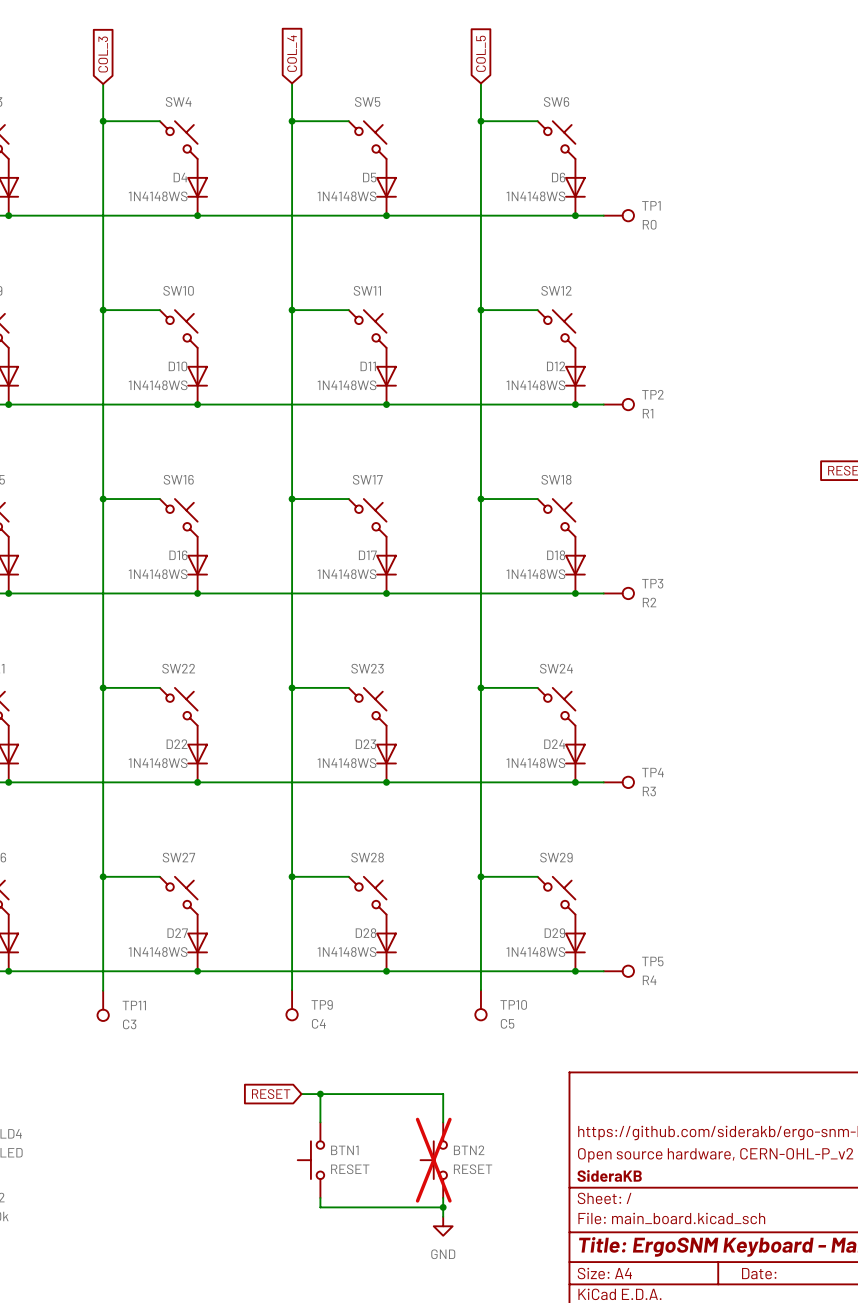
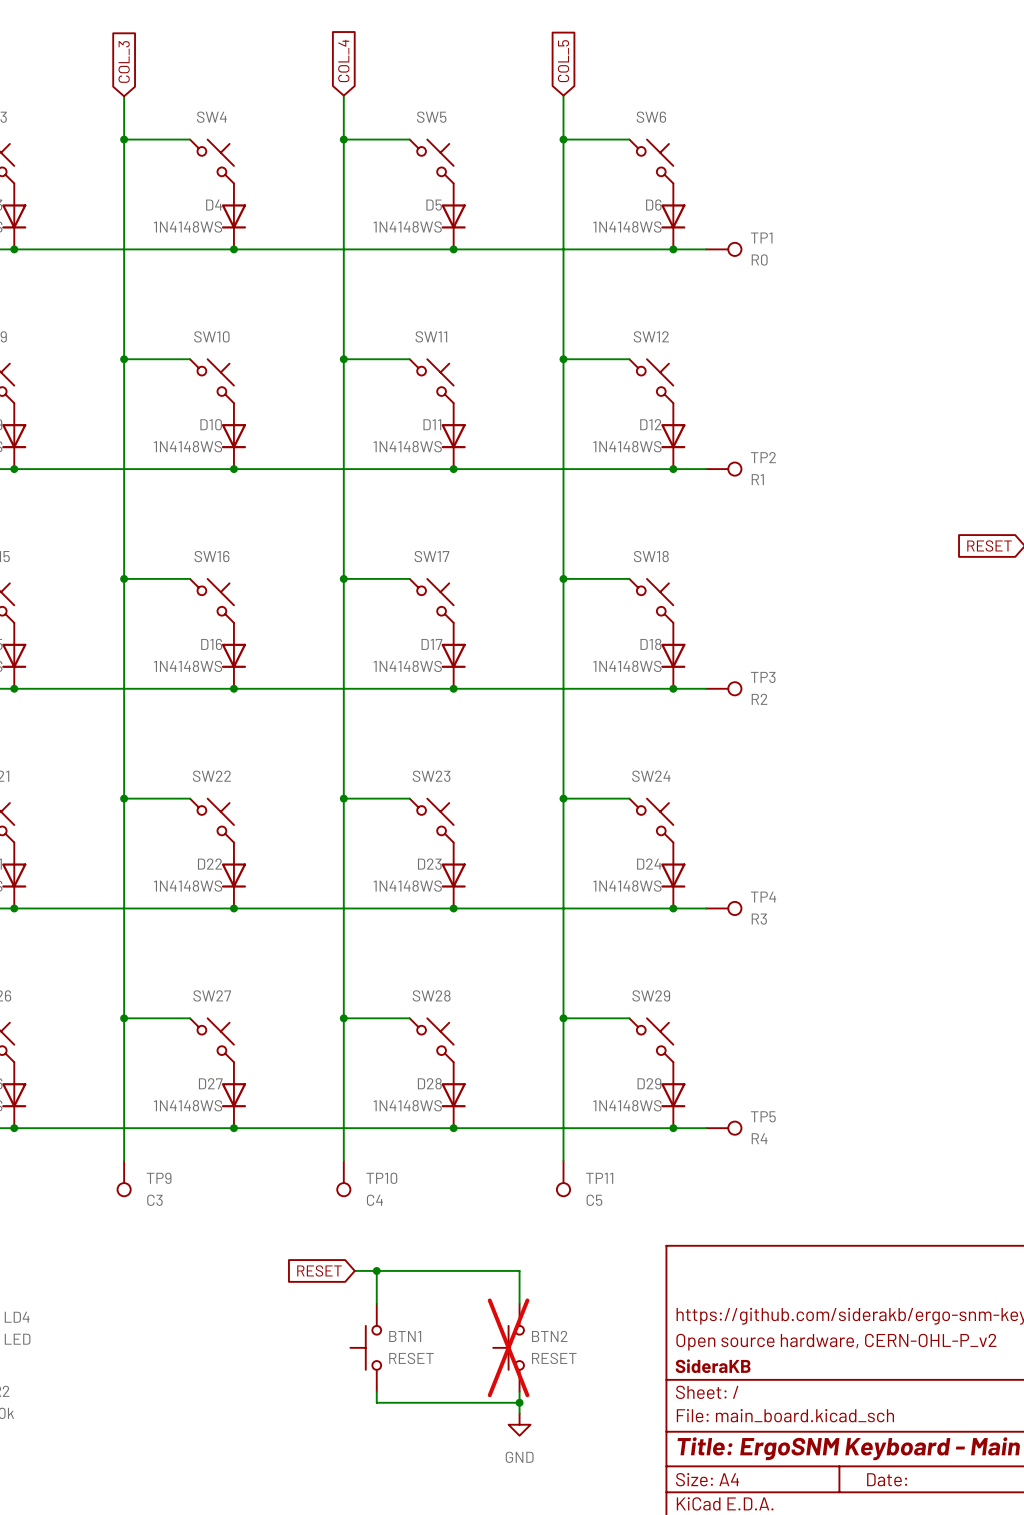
TP11 position: (103, 1005) -> (563, 1178)
TP9 position: (292, 1005) -> (124, 1178)
TP10 position: (480, 1005) -> (343, 1178)
TP9 value: C4 (318, 1023) -> C3 (154, 1200)
TP10 value: C5 (507, 1023) -> C4 (374, 1200)
TP11 value: C3 (129, 1024) -> C5 (594, 1200)

